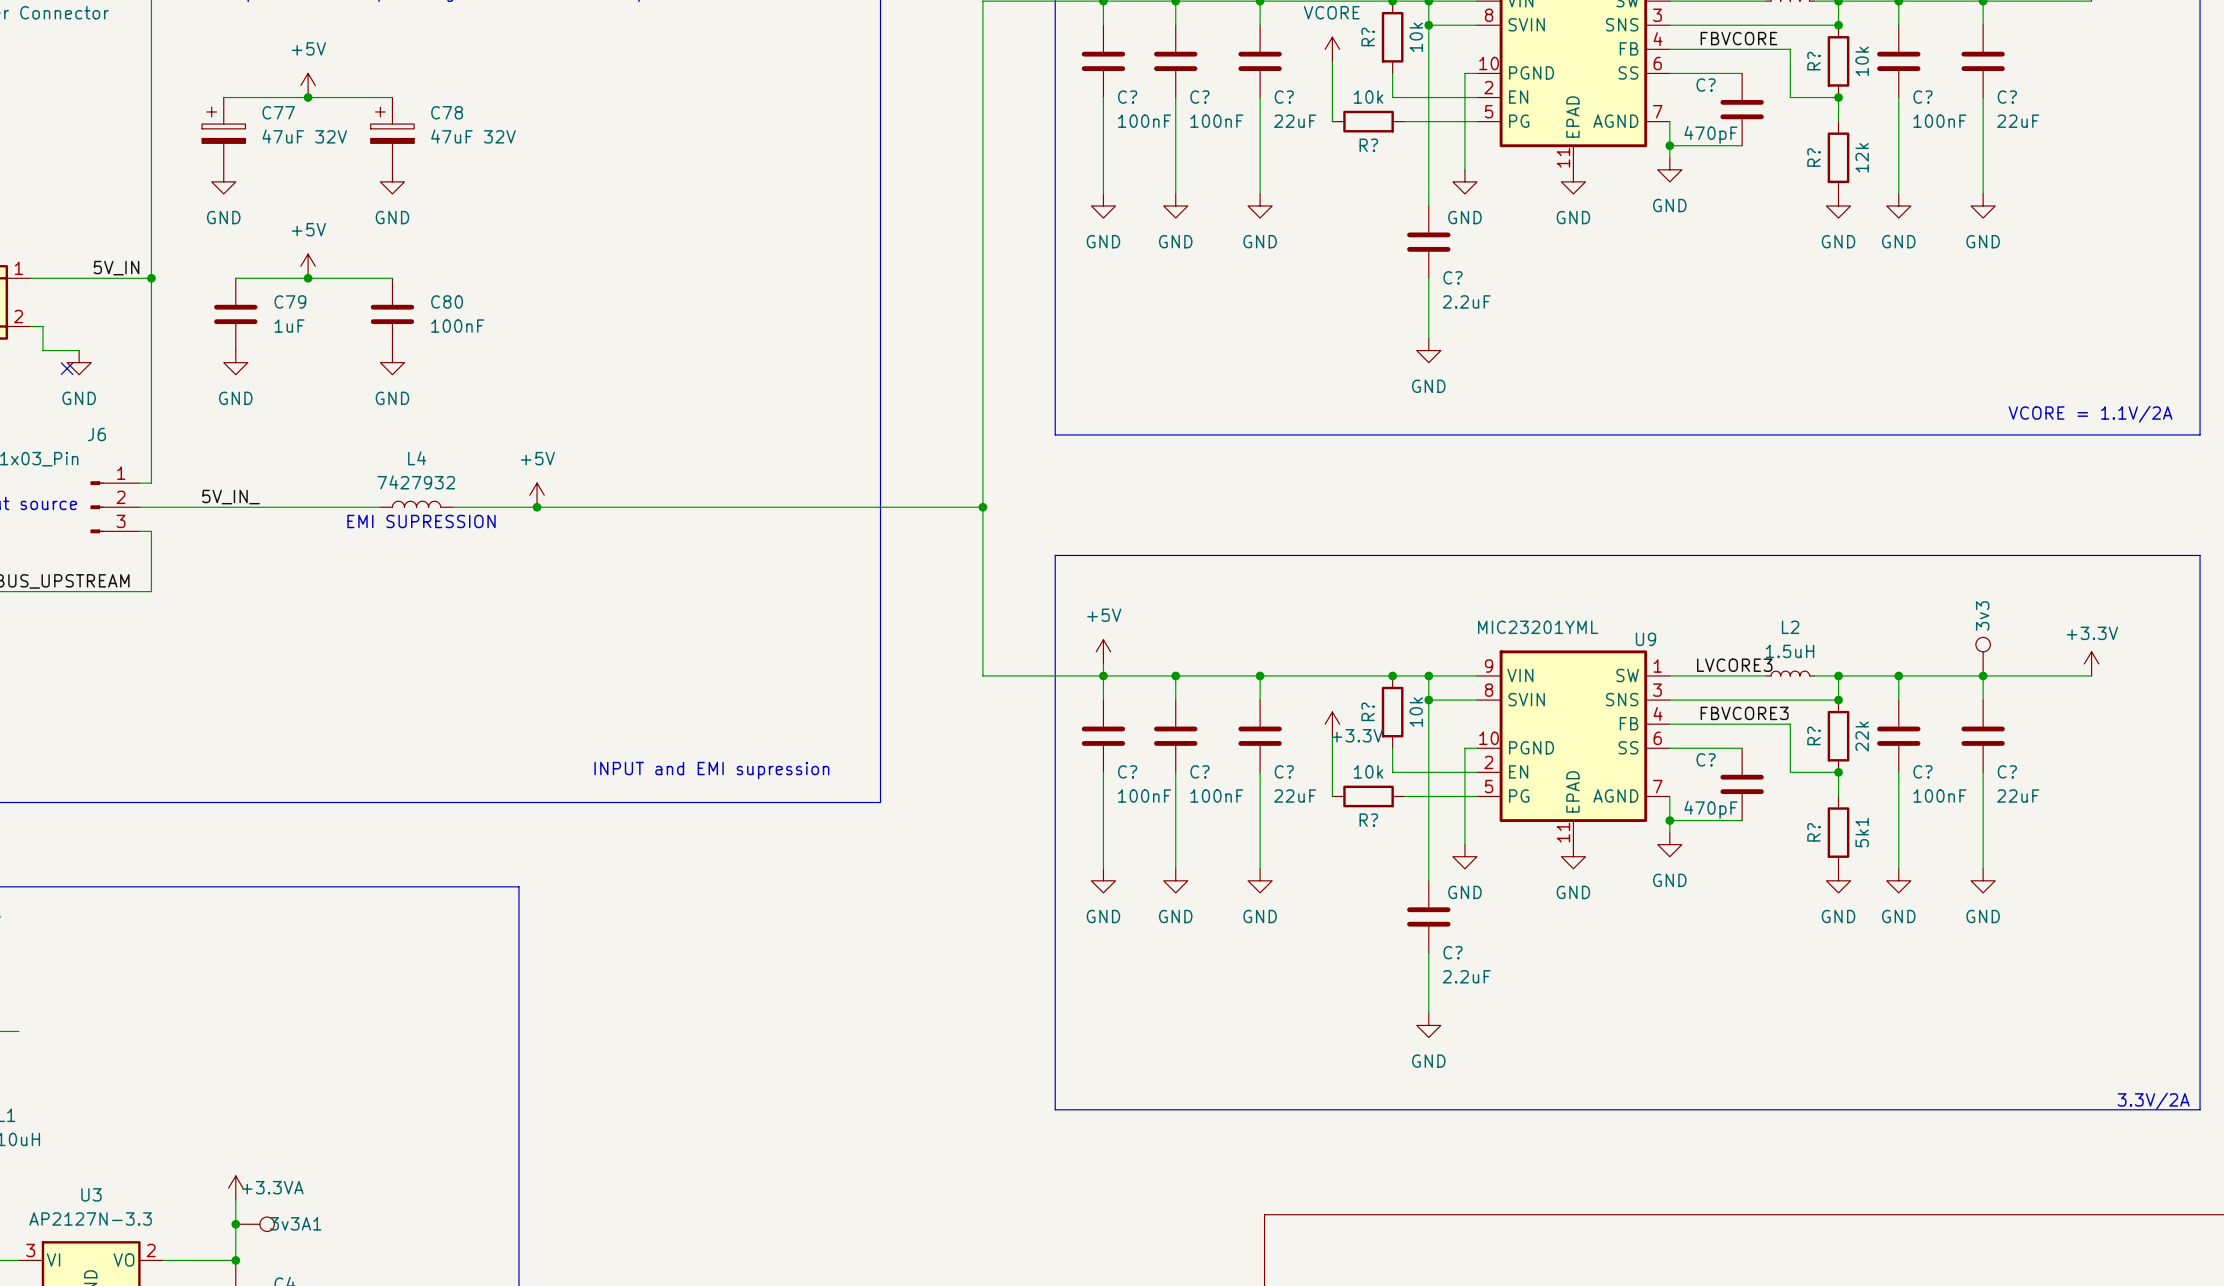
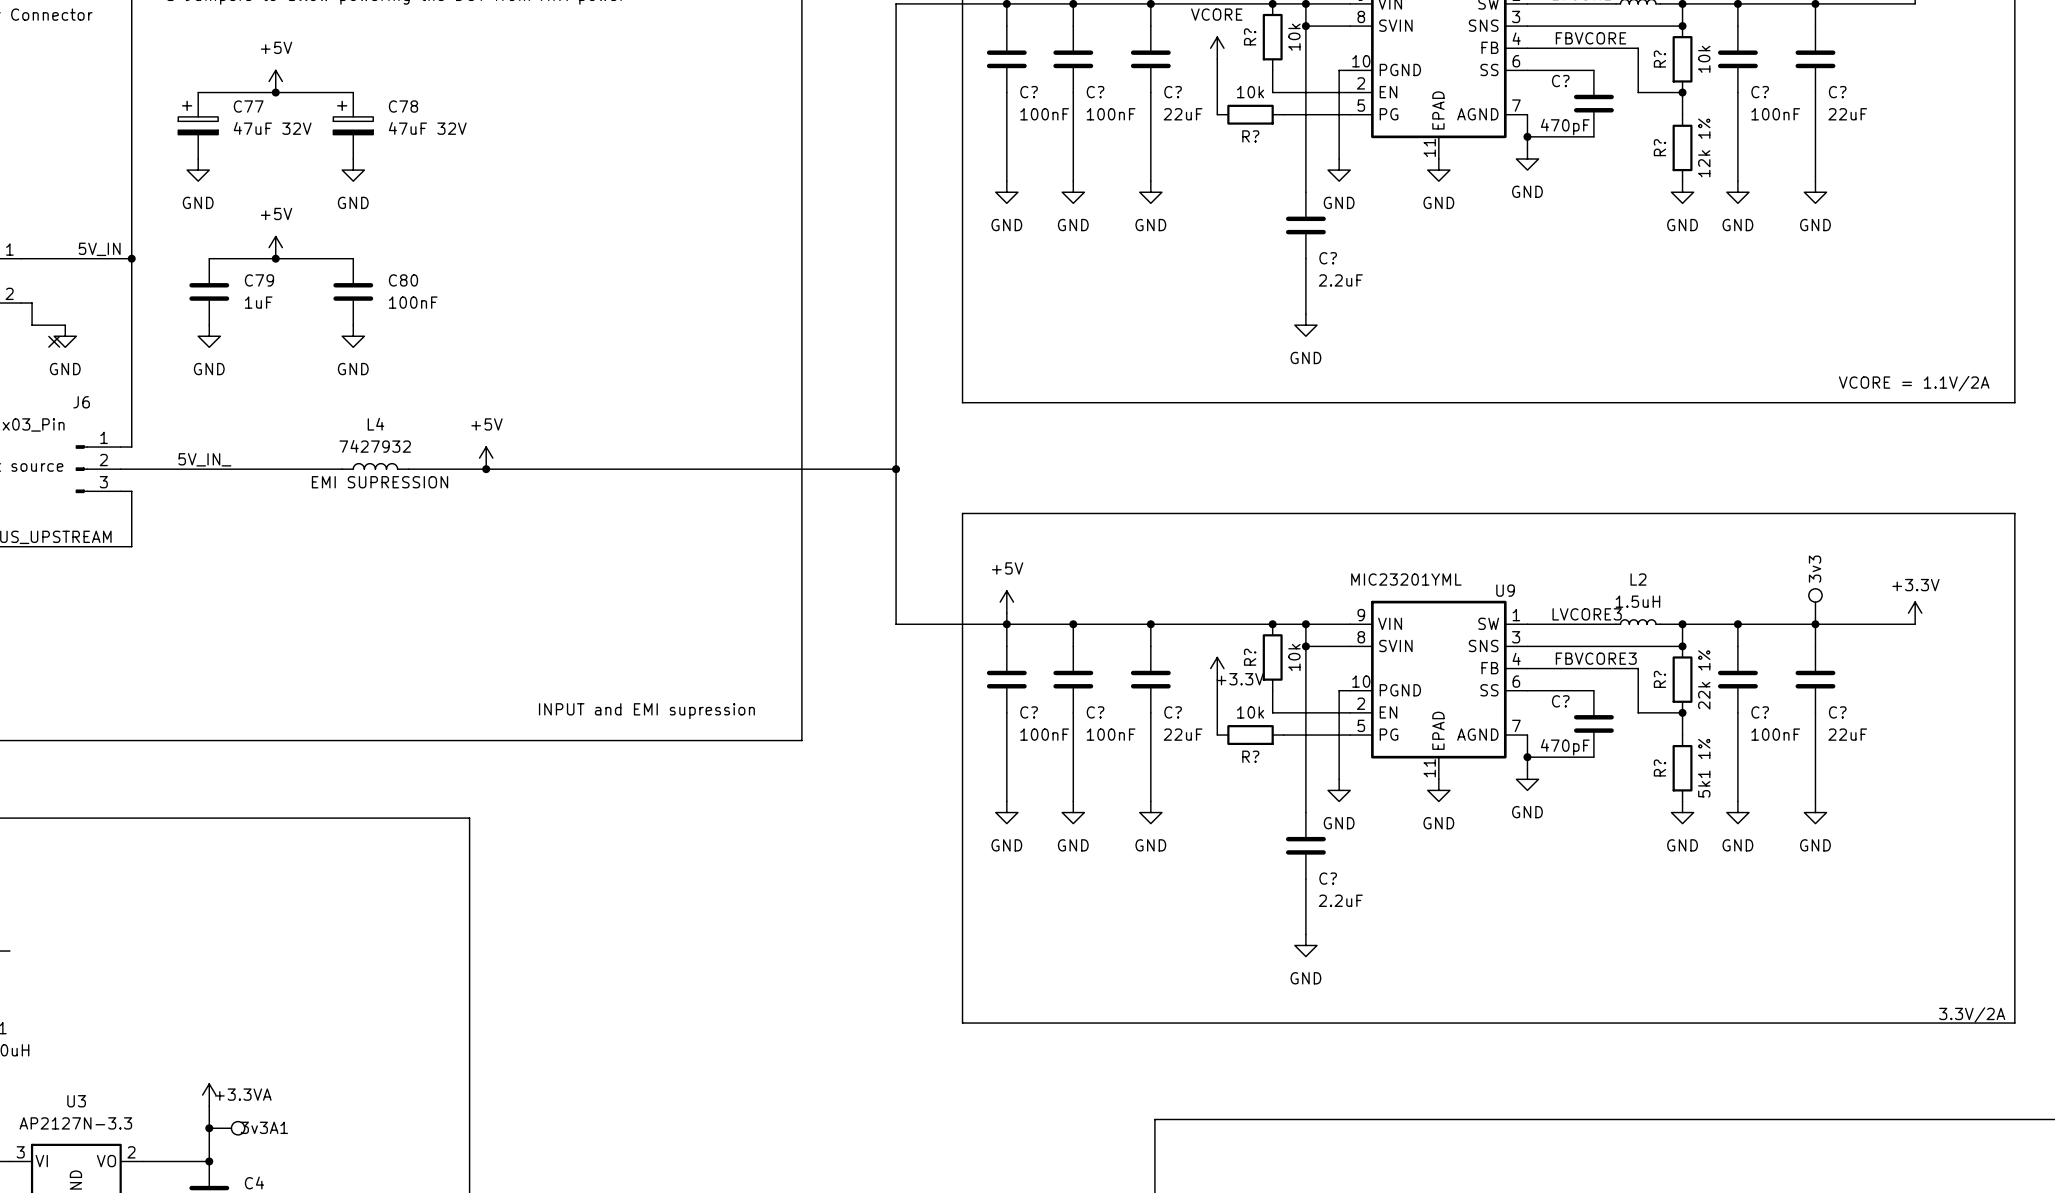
R? value: 12k (1862, 157) -> 12k 1% (1704, 147)
R? value: 22k (1862, 736) -> 22k 1% (1704, 679)
R? value: 5k1 (1862, 832) -> 5k1 1% (1704, 768)

